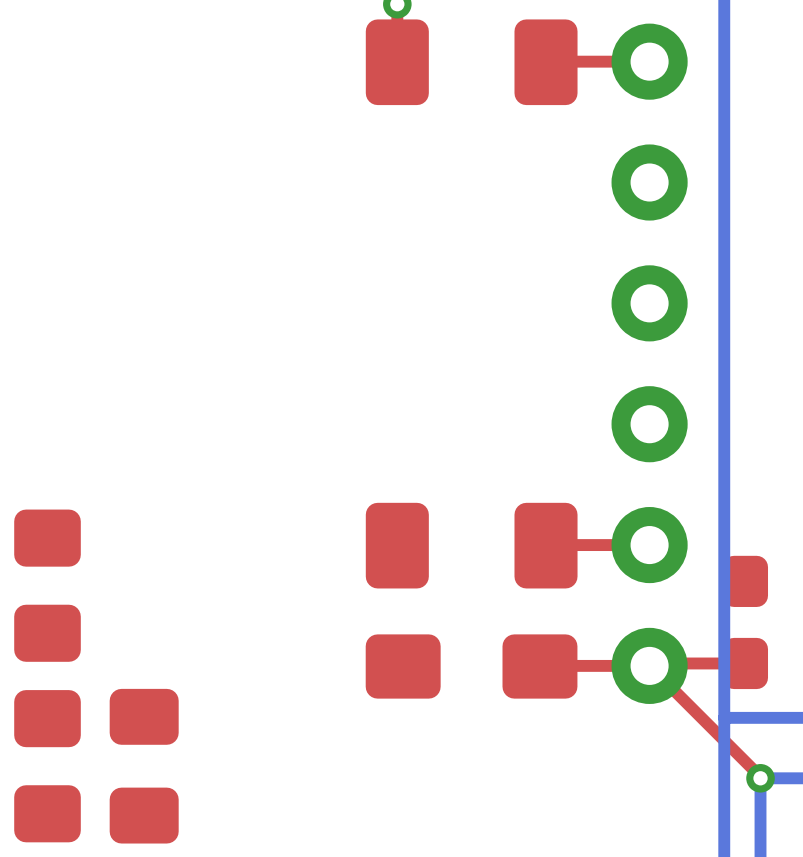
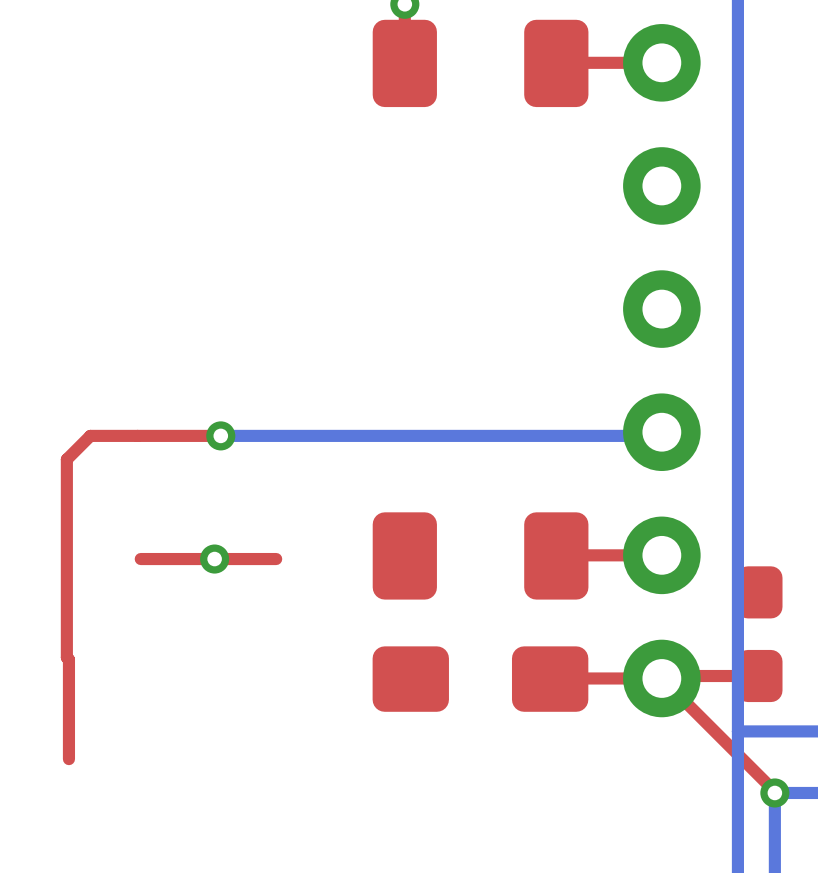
top track: none -> (220, 435) (90, 435) (66, 459) (68, 759)
via: none -> (220, 435)
bottom track: none -> (658, 435) (220, 435)
via: none -> (214, 559)
top track: none -> (276, 559) (140, 559)
part: (47, 585) -> none
part: (47, 766) -> none
part: (144, 766) -> none

